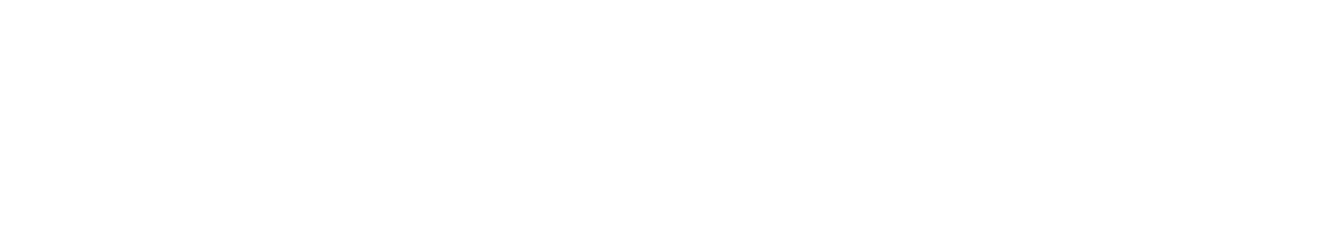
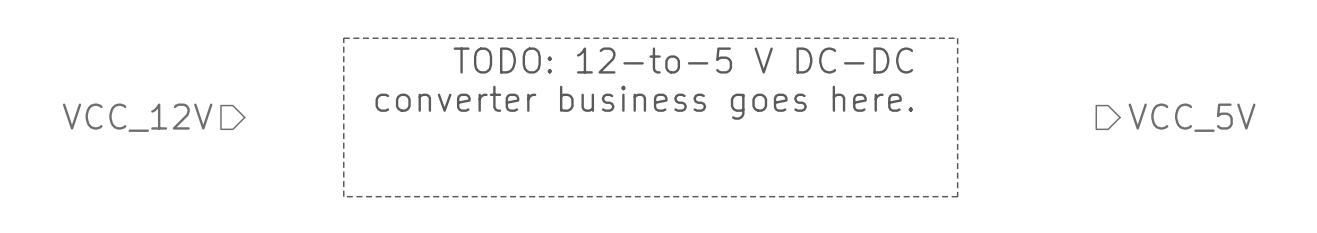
line: none -> (343, 38) (957, 38) (957, 196) (343, 196) (343, 38)
text: none -> TODO: 12-to-5 V DC-DC (683, 60)
text: none -> converter business goes here. (644, 102)
hierarchical label: none -> VCC_12V (137, 117)
hierarchical label: none -> VCC_5V (1192, 117)

